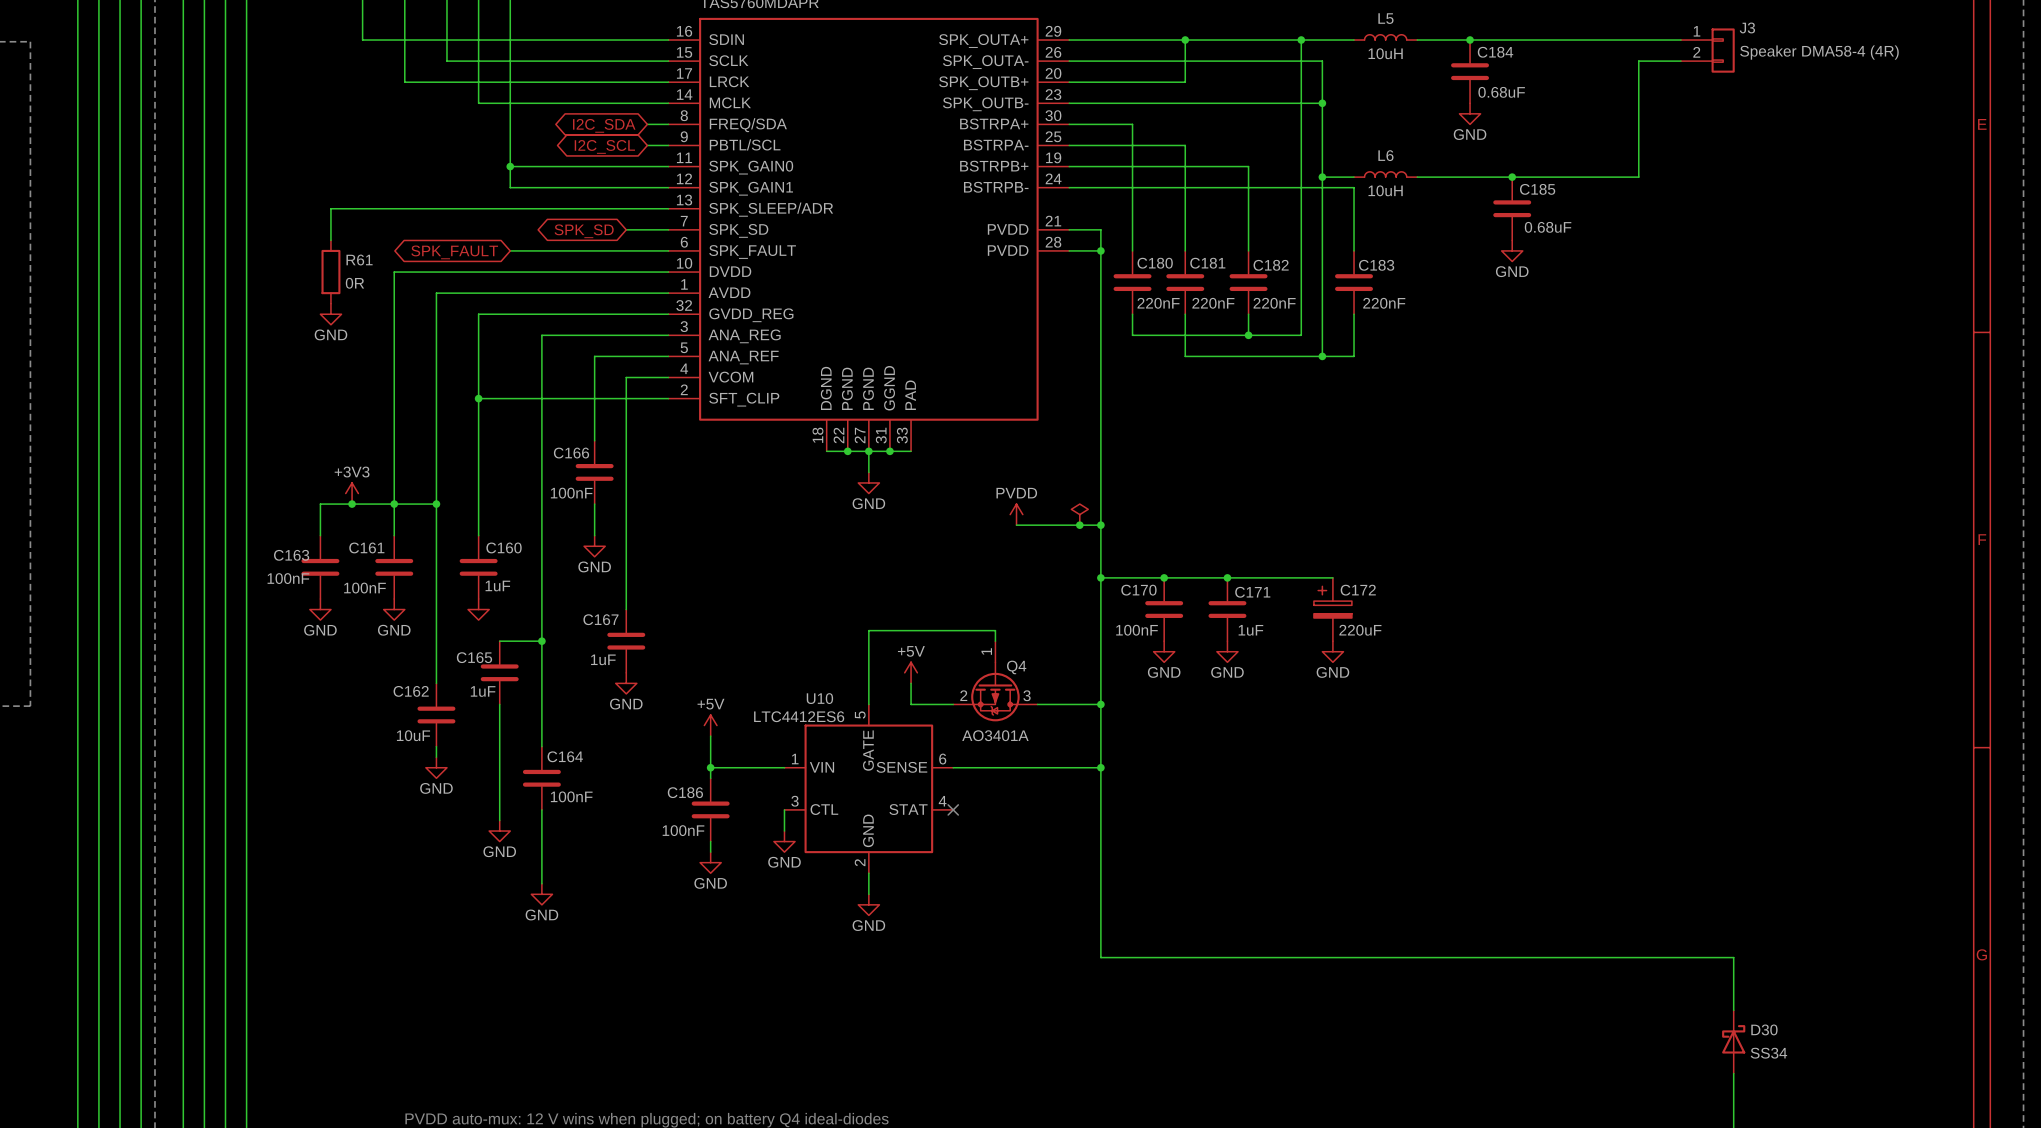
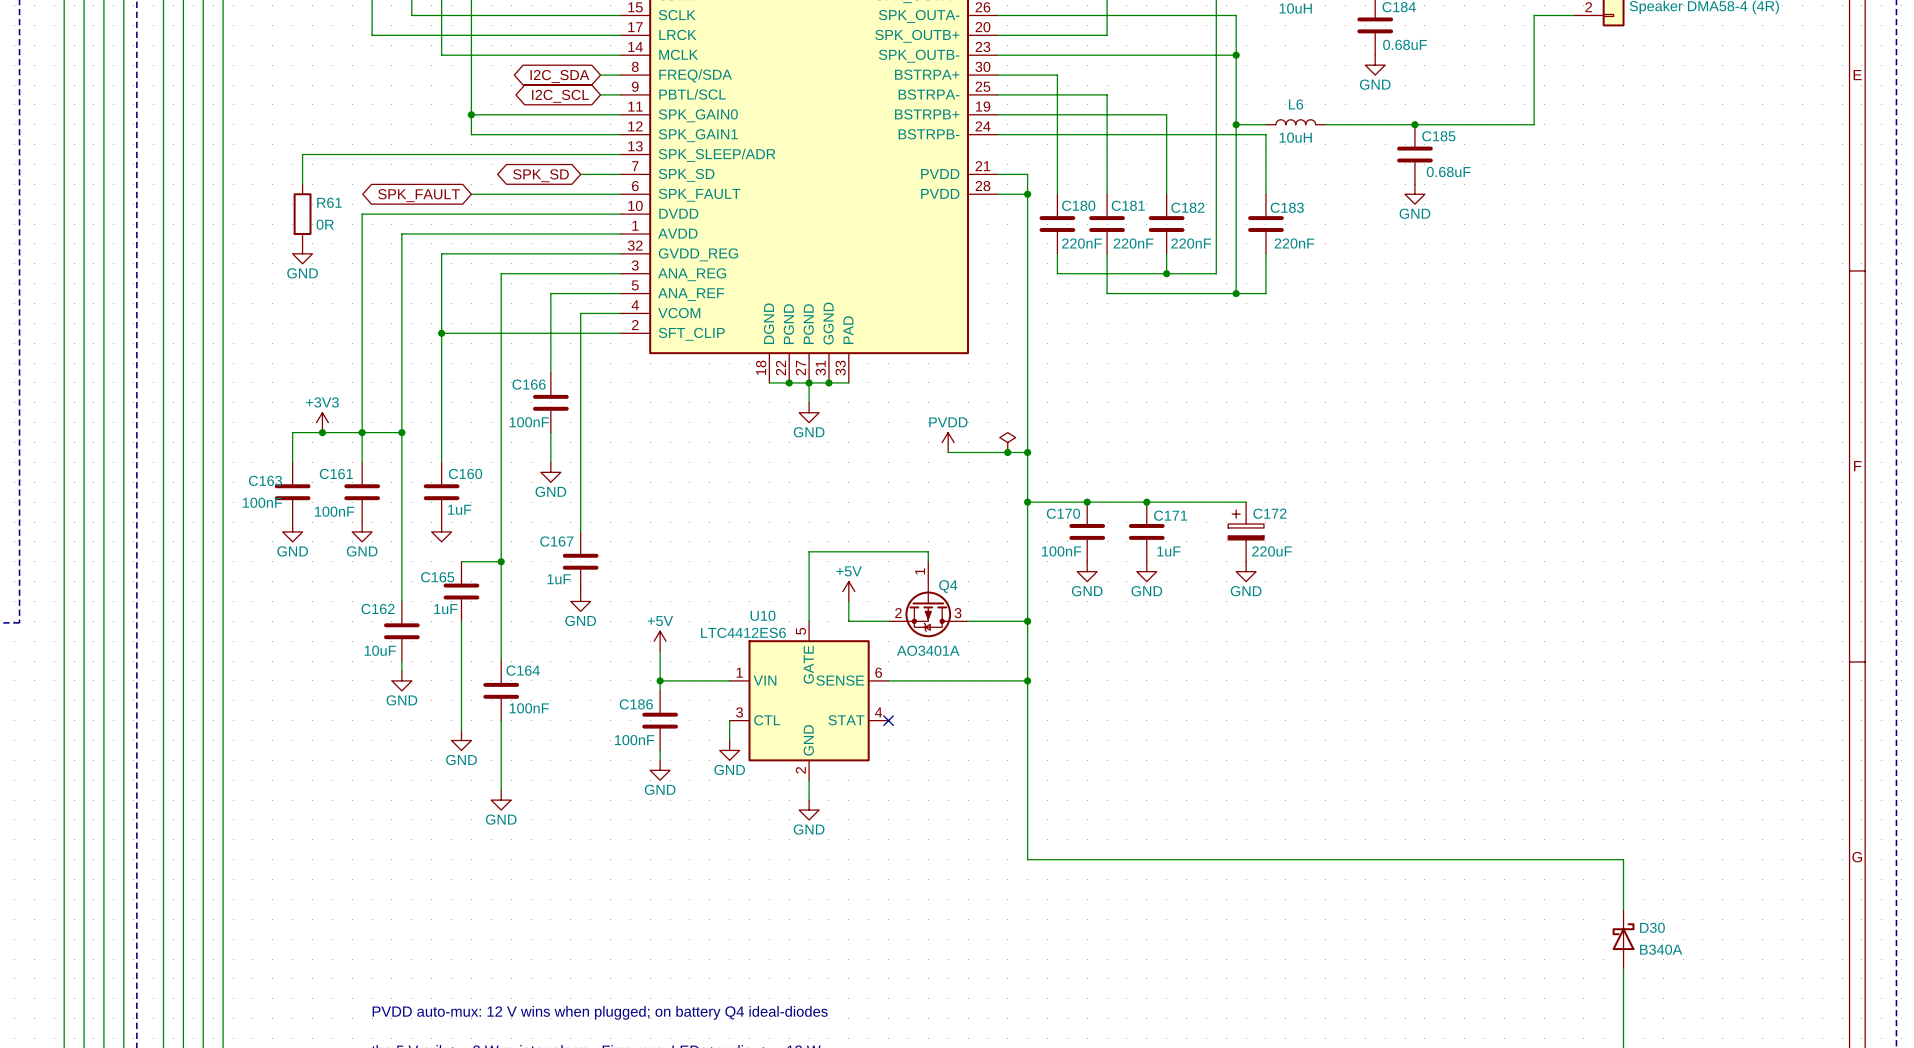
D30 value: SS34 (1768, 1053) -> B340A (1661, 949)

